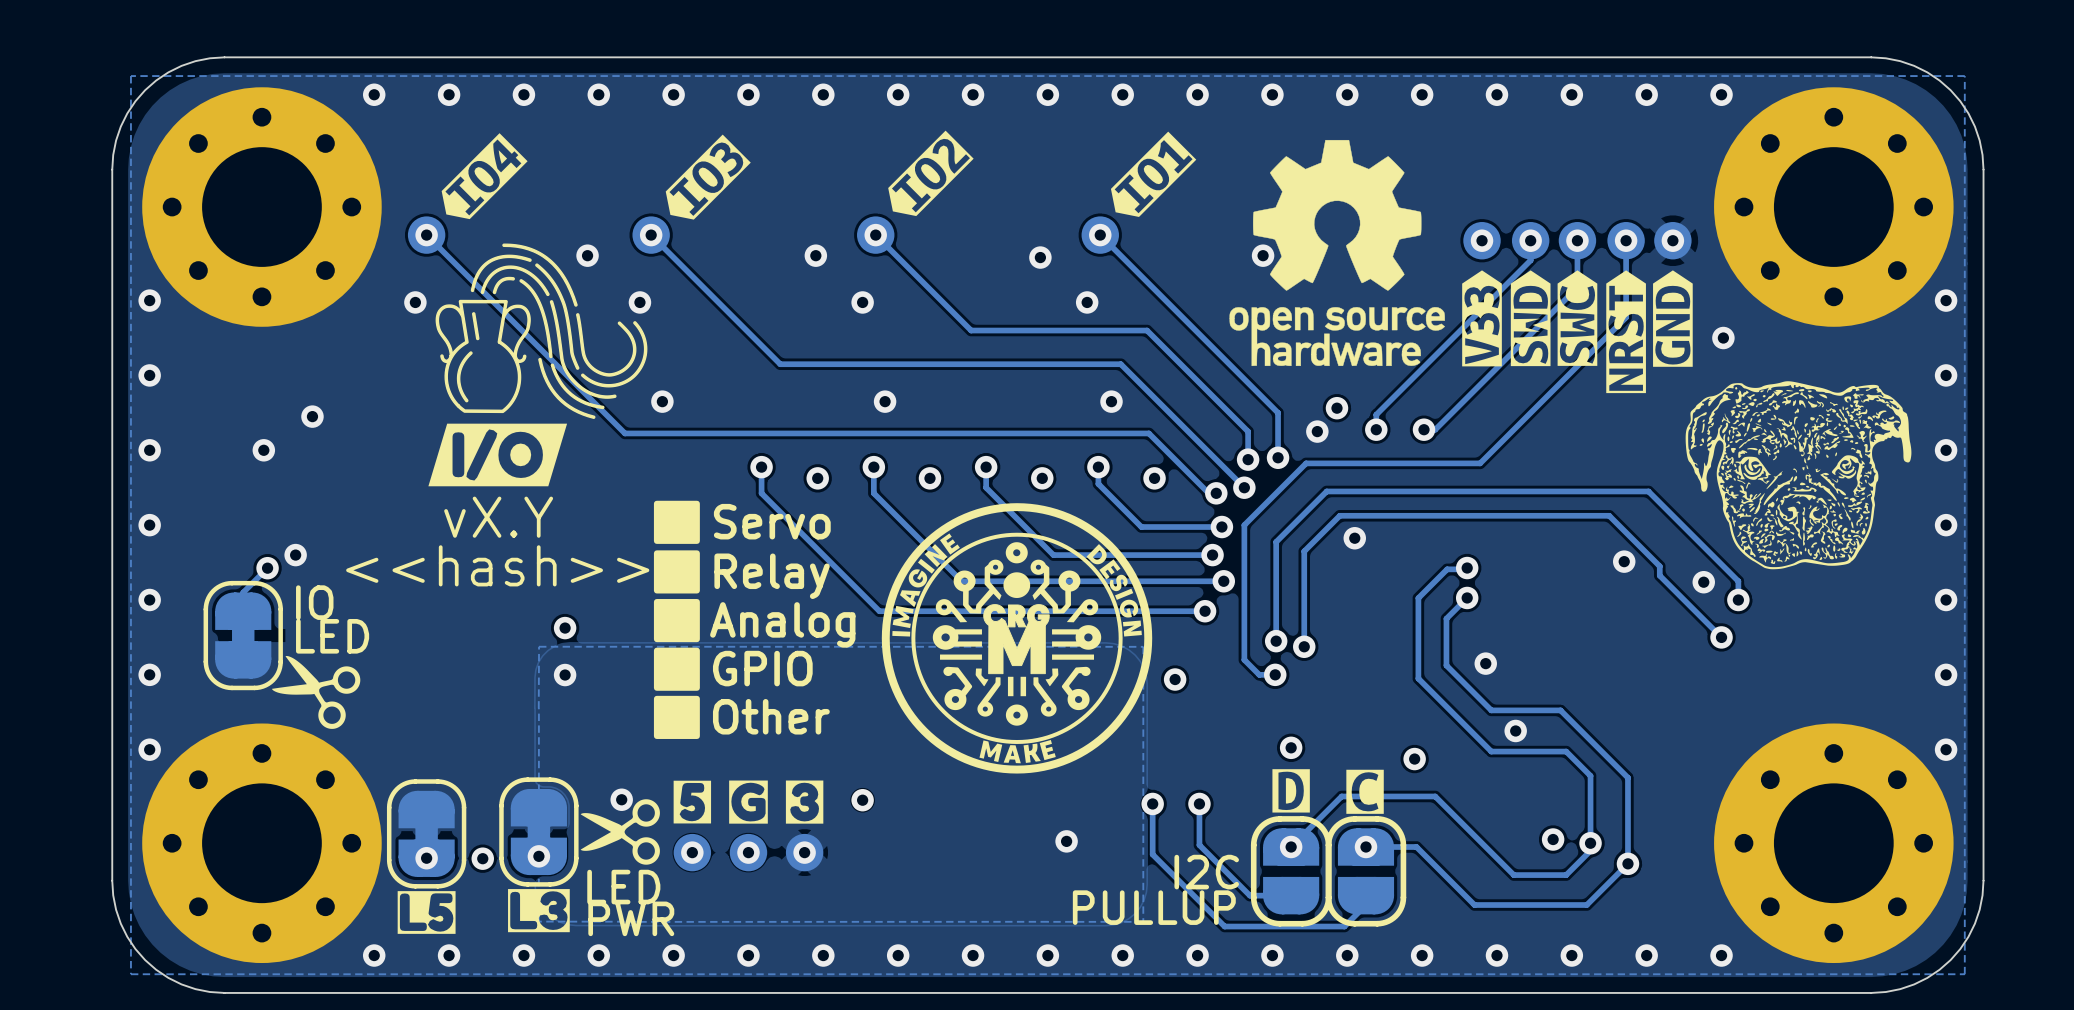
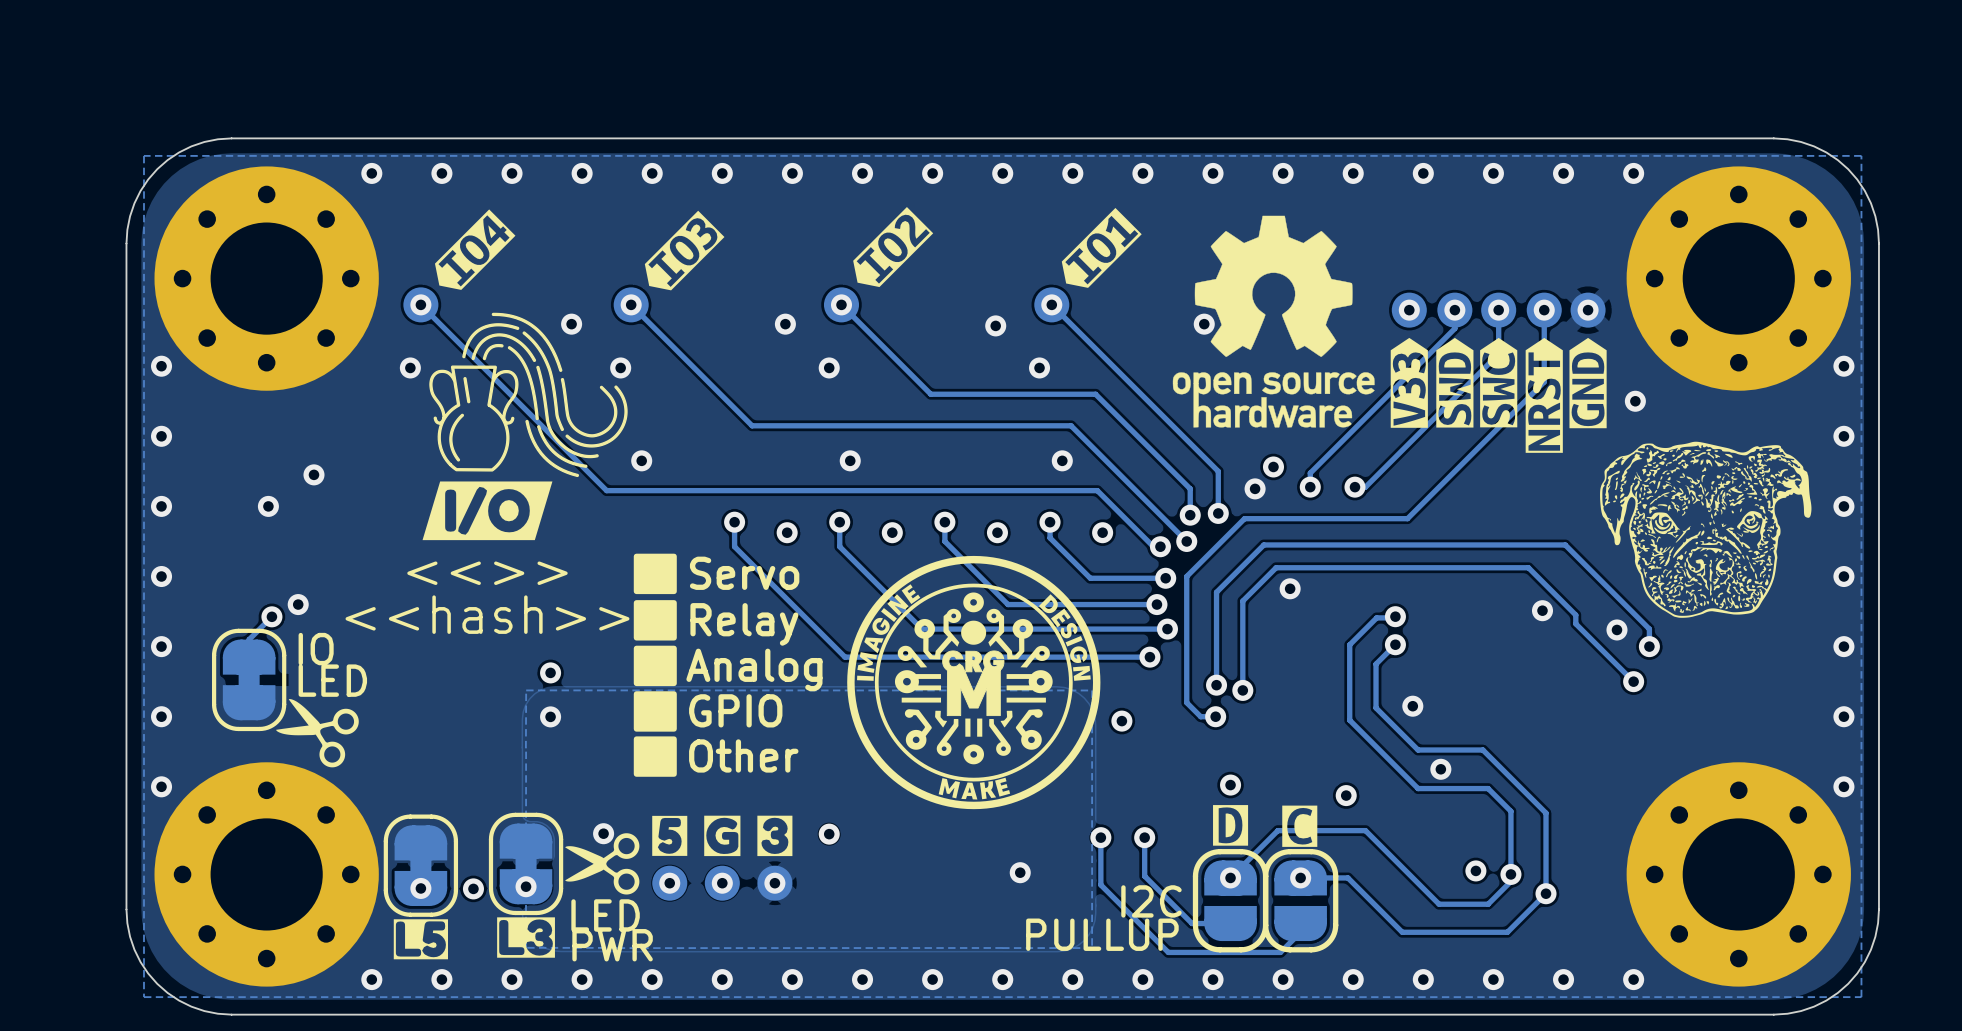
text: vX.Y (498, 517) -> <<>> (487, 573)

